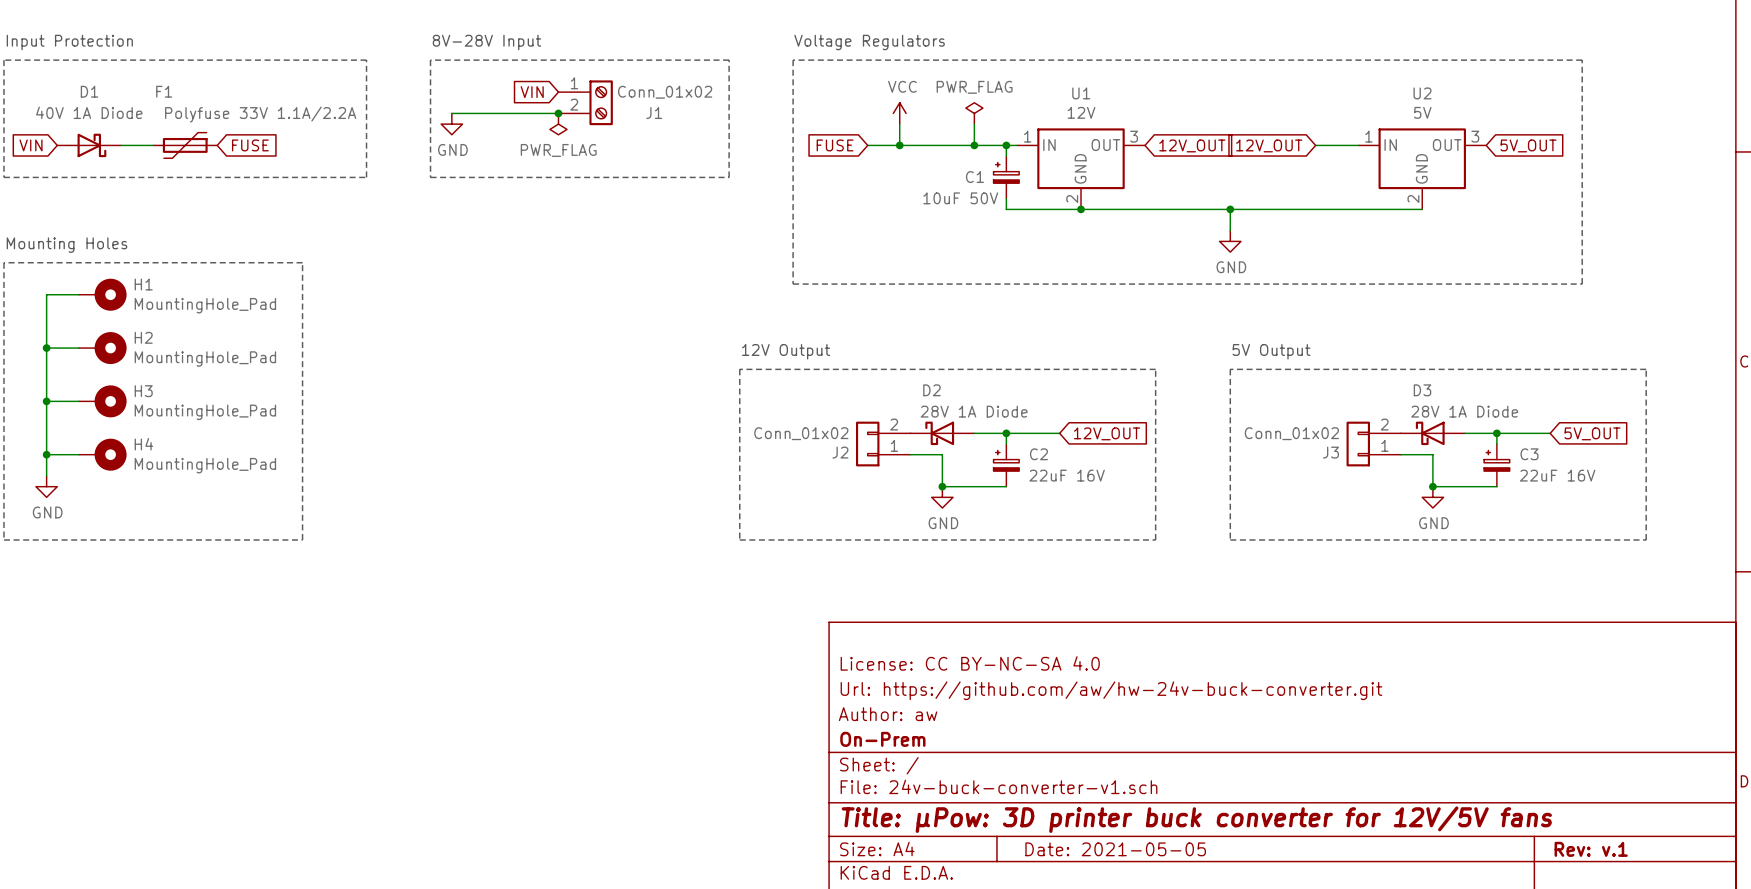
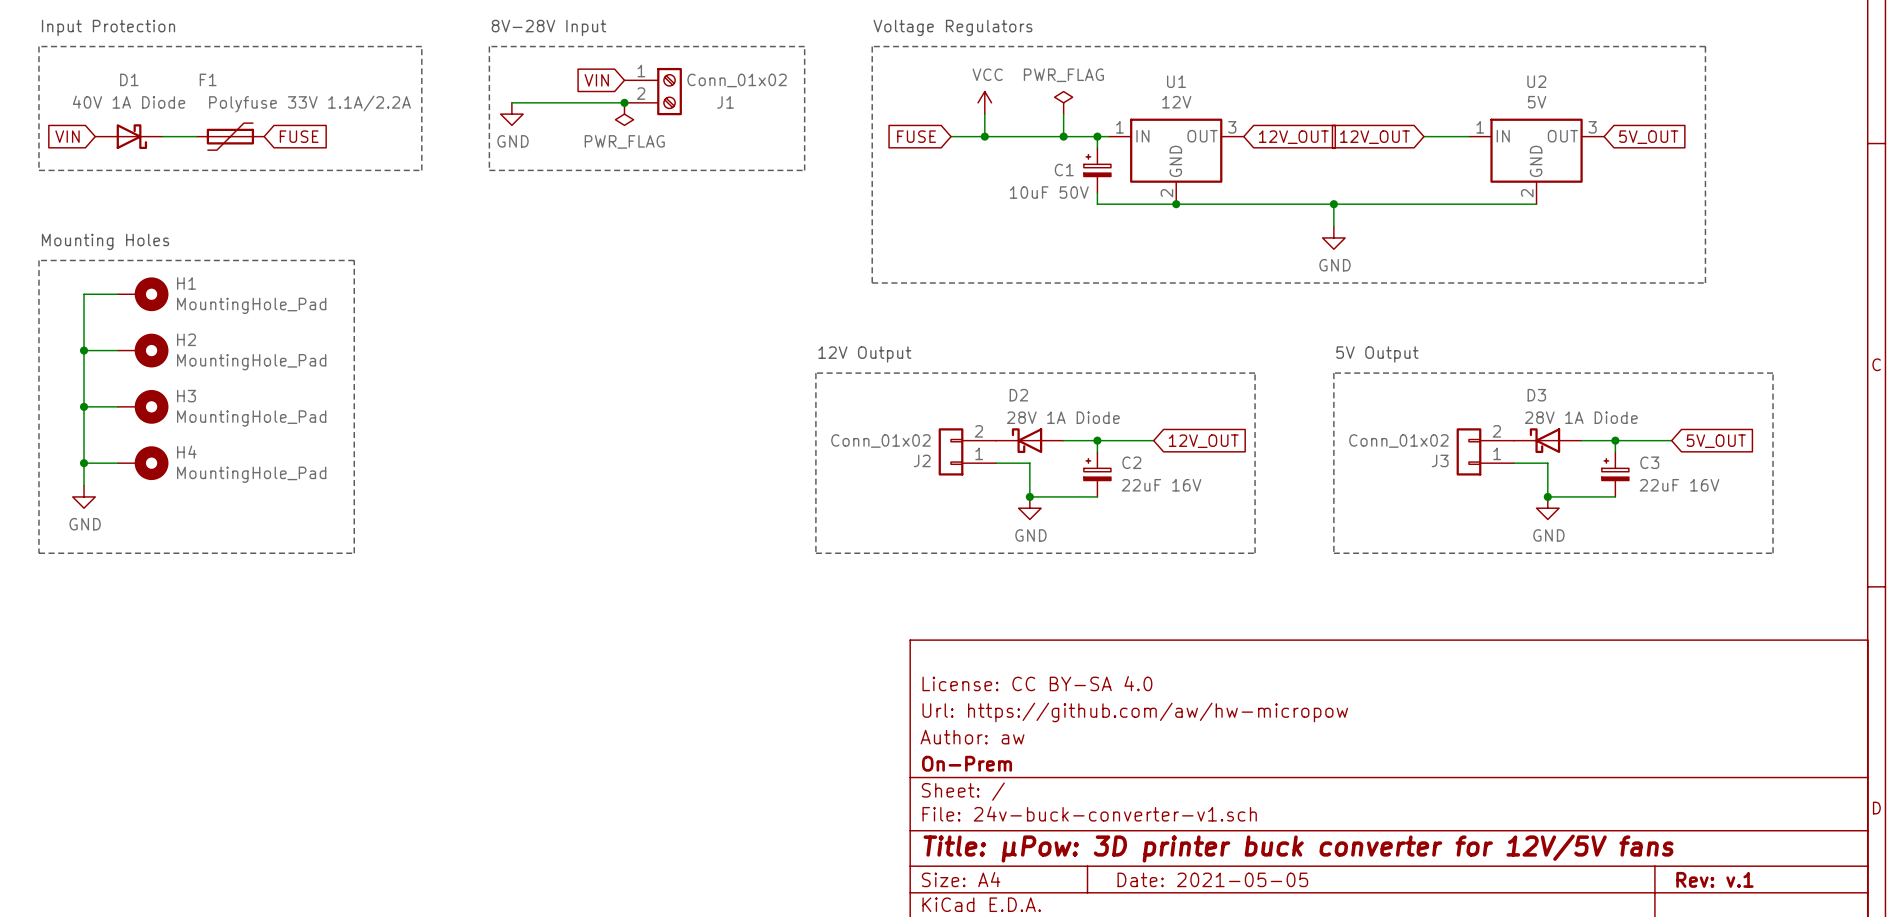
title block: License: CC BY-NC-SA 4.0 (970, 663) -> License: CC BY-SA 4.0 (1037, 683)
title block: Url: https://github.com/aw/hw-24v-buck-converter.git (1111, 690) -> Url: https://github.com/aw/hw-micropow (1135, 712)

